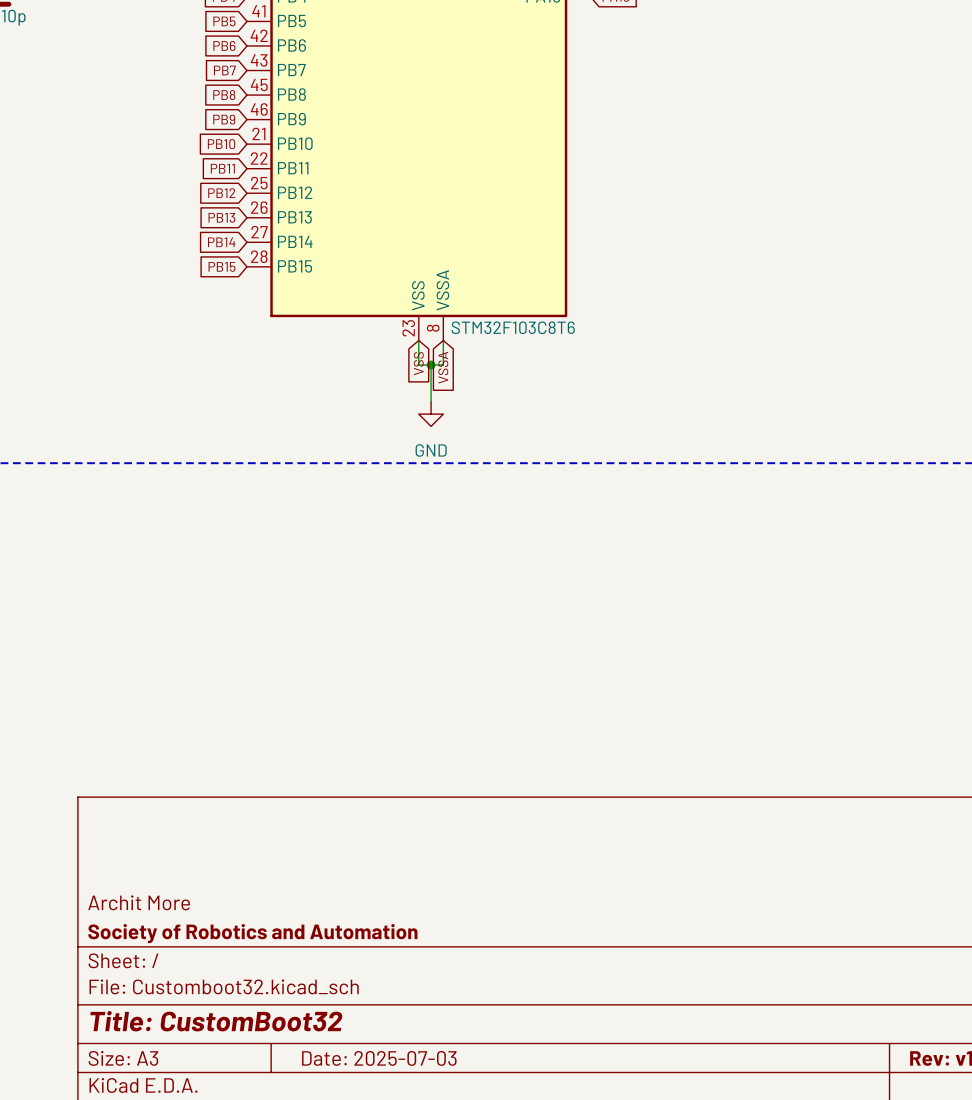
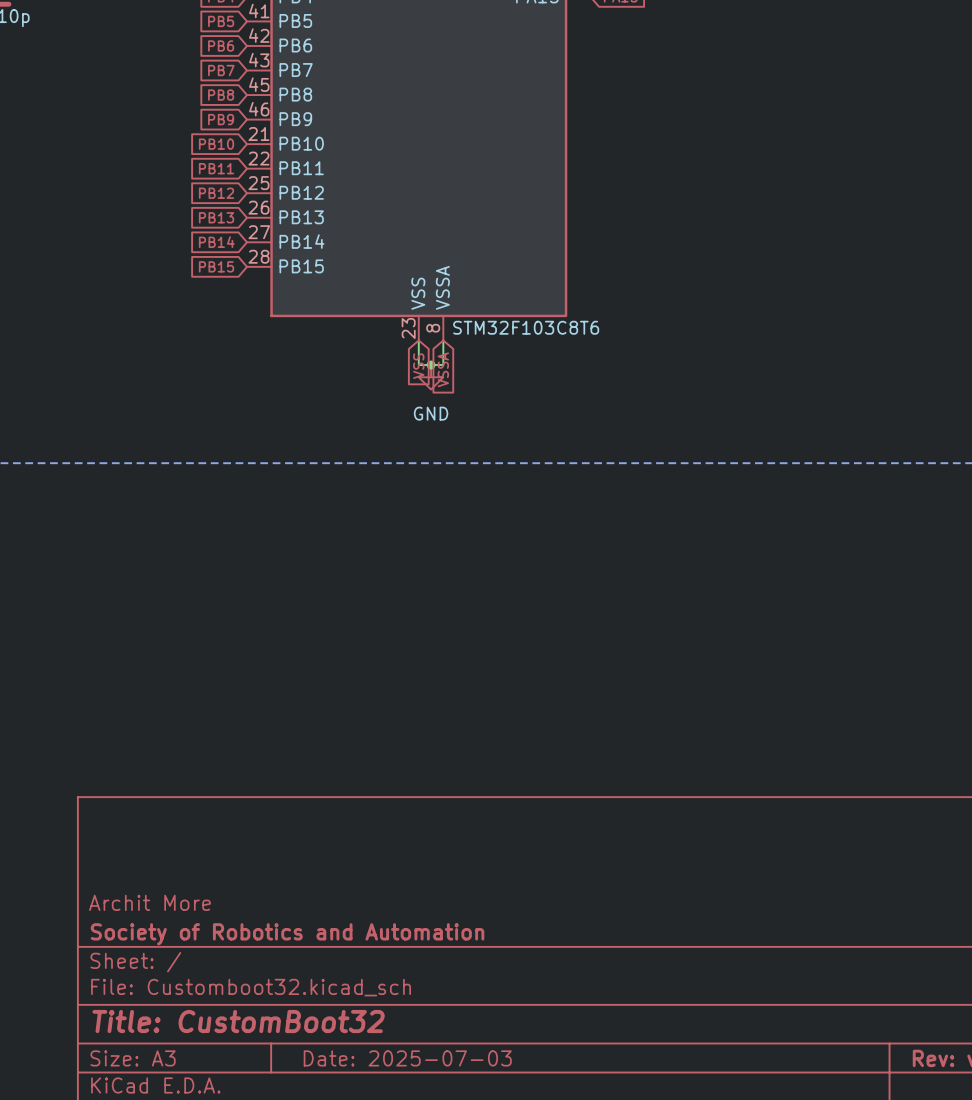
wire: (431, 365) (431, 401) -> none
power symbol position: GND (431, 414) -> GND (431, 377)

